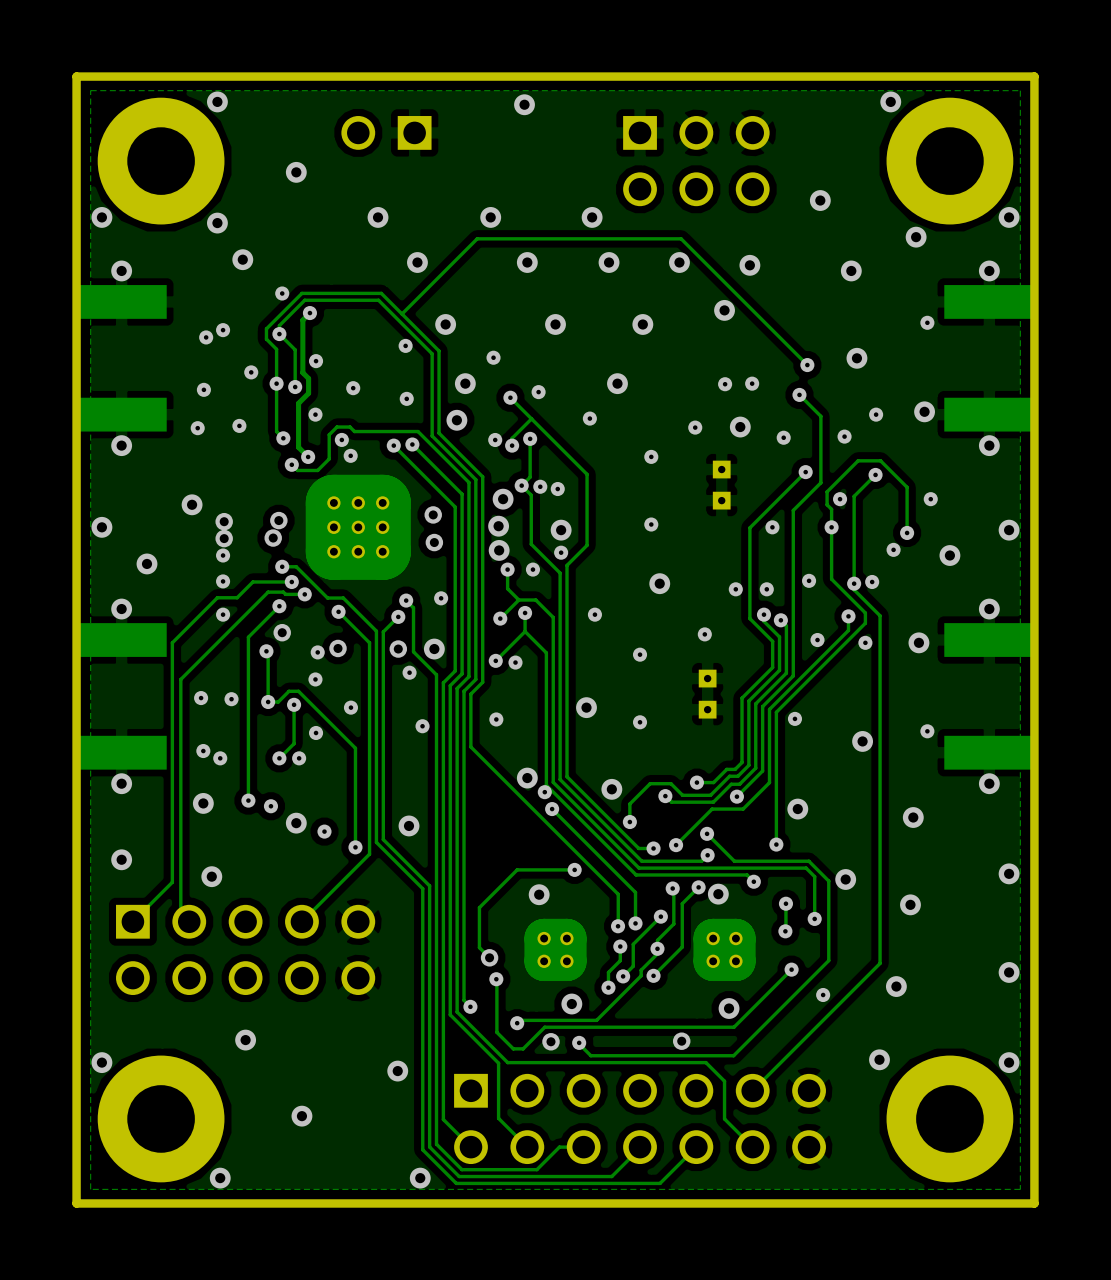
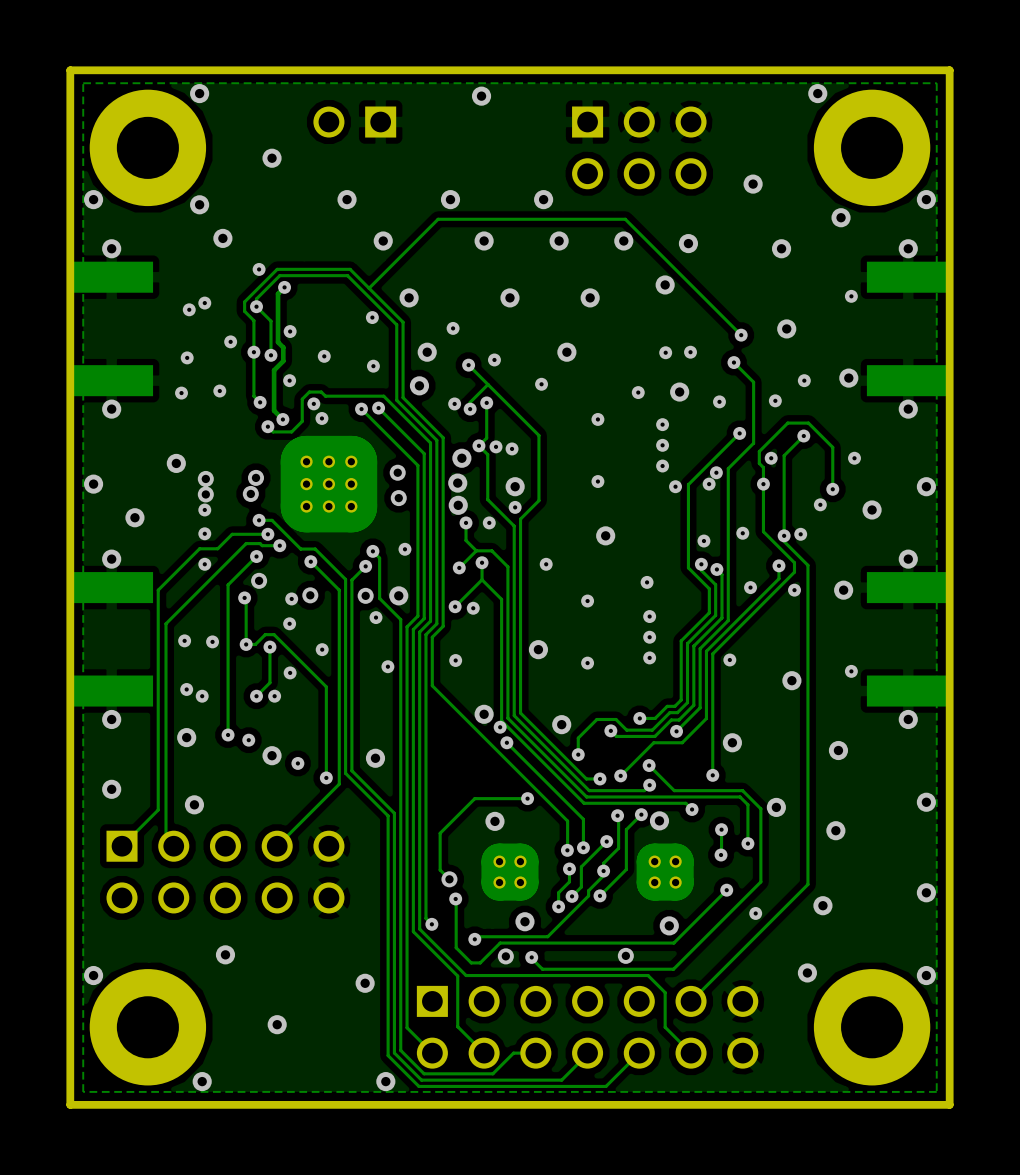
via: none -> (662, 424)
part: (721, 485) -> none
via: none -> (662, 445)
via: none -> (662, 466)
via: none -> (716, 472)
via: none -> (675, 486)
via: (735, 589) -> none
via: none -> (649, 616)
part: (707, 694) -> none
via: none -> (649, 637)
via: none -> (649, 657)

